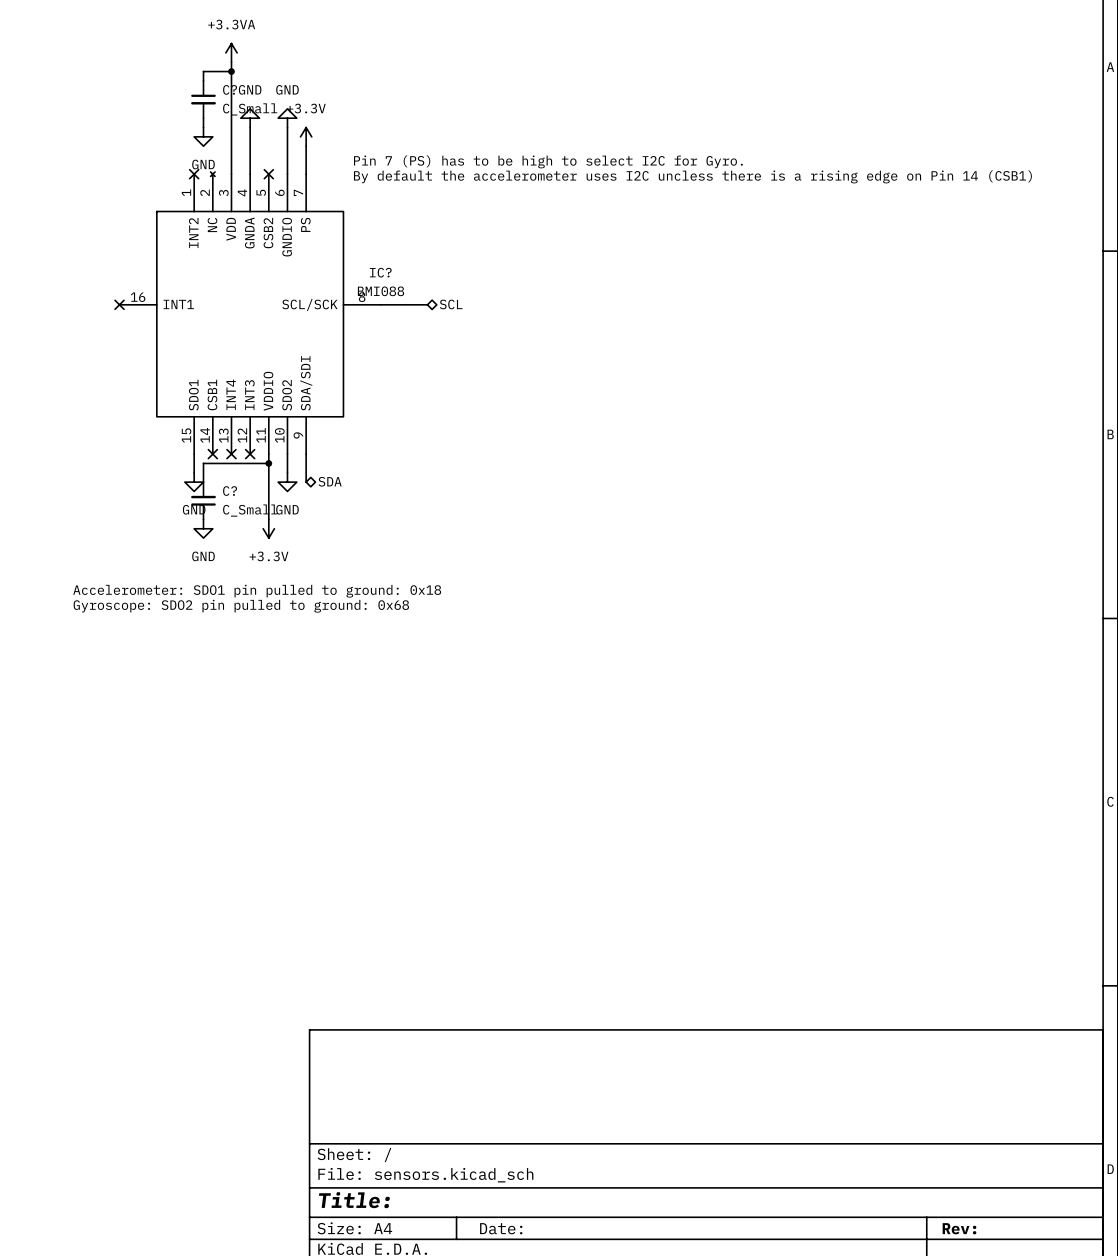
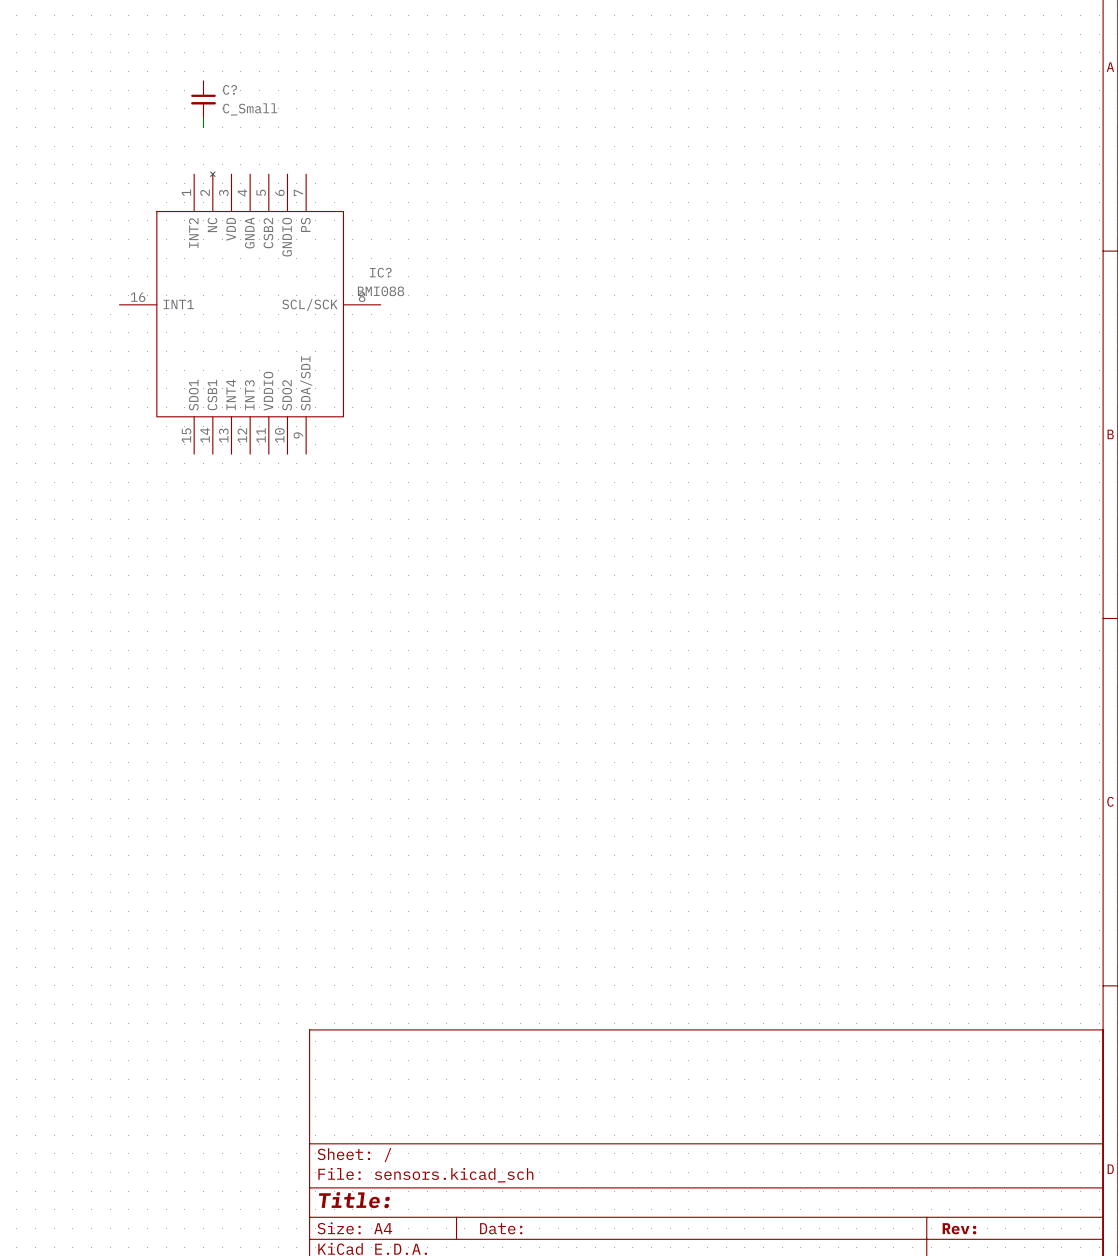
power symbol: +3.3VA (231, 52) -> none
wire: (231, 62) (231, 174) -> none
wire: (231, 71) (203, 71) (203, 80) -> none
junction: (231, 71) -> none
power symbol: GND (250, 118) -> none
power symbol: GND (287, 118) -> none
wire: (250, 127) (250, 174) -> none
wire: (287, 127) (287, 174) -> none
power symbol: GND (203, 136) -> none
power symbol: +3.3V (306, 136) -> none
wire: (306, 146) (306, 174) -> none
text: Pin 7 (PS) has to be high to select I2C for Gyro. (548, 161) -> none
no-connect mark: (194, 174) -> none
no-connect mark: (268, 174) -> none
text: By default the accelerometer uses I2C uncless there is a rising edge on Pin 14 (CSB1) (692, 176) -> none
no-connect mark: (119, 304) -> none
wire: (380, 304) (427, 304) -> none
hierarchical label: SCL (451, 304) -> none
wire: (194, 454) (194, 472) -> none
no-connect mark: (212, 454) -> none
no-connect mark: (231, 454) -> none
no-connect mark: (250, 454) -> none
wire: (268, 454) (268, 519) -> none
wire: (287, 454) (287, 472) -> none
wire: (306, 454) (306, 482) -> none
wire: (268, 463) (203, 463) (203, 482) -> none
junction: (268, 463) -> none
hierarchical label: SDA (330, 481) -> none
power symbol: GND (194, 482) -> none
power symbol: GND (287, 482) -> none
C?: C_Small (203, 500) -> none
power symbol: GND (203, 528) -> none
power symbol: +3.3V (268, 528) -> none
text: Accelerometer: SDO1 pin pulled to ground: 0x18 (257, 591) -> none
text: Gyroscope: SDO2 pin pulled to ground: 0x68 (241, 606) -> none

